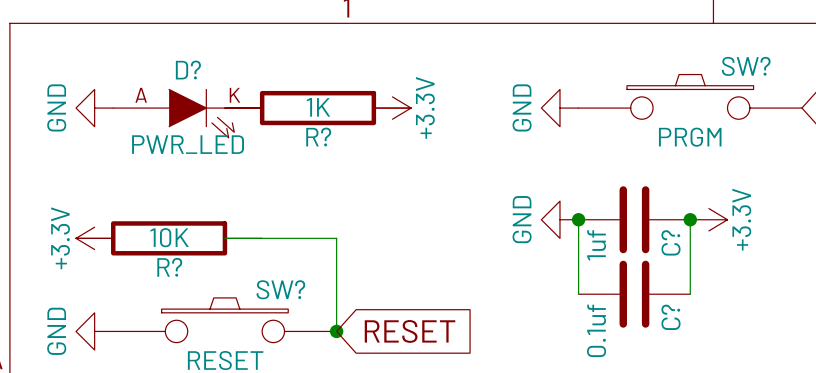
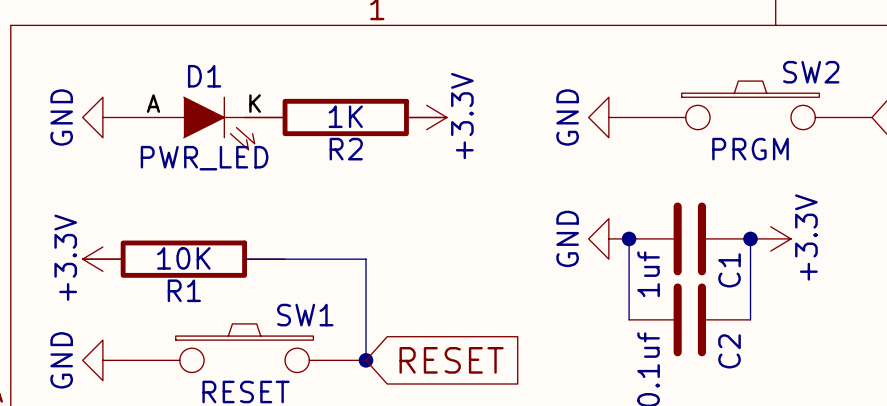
SW? name: SW? (746, 66) -> SW2 (811, 72)
D? name: D? (188, 70) -> D1 (204, 76)
R? name: R? (318, 137) -> R2 (346, 149)
C? name: C? (670, 242) -> C1 (729, 270)
R? name: R? (169, 267) -> R1 (184, 290)
SW? name: SW? (280, 289) -> SW1 (305, 315)
C? name: C? (670, 317) -> C2 (729, 351)

